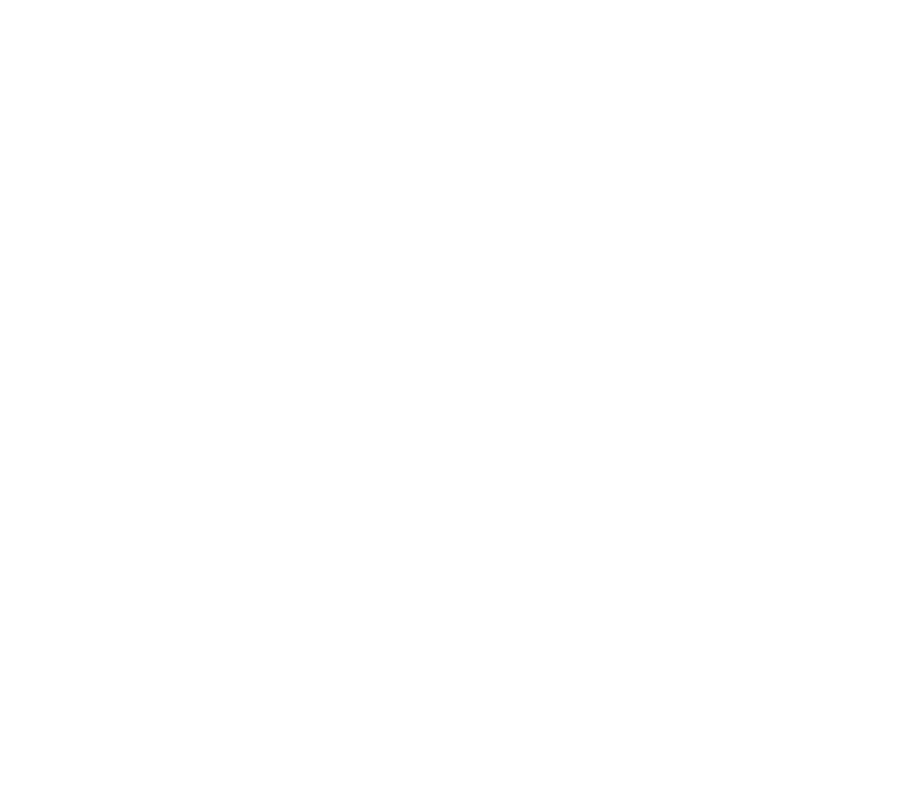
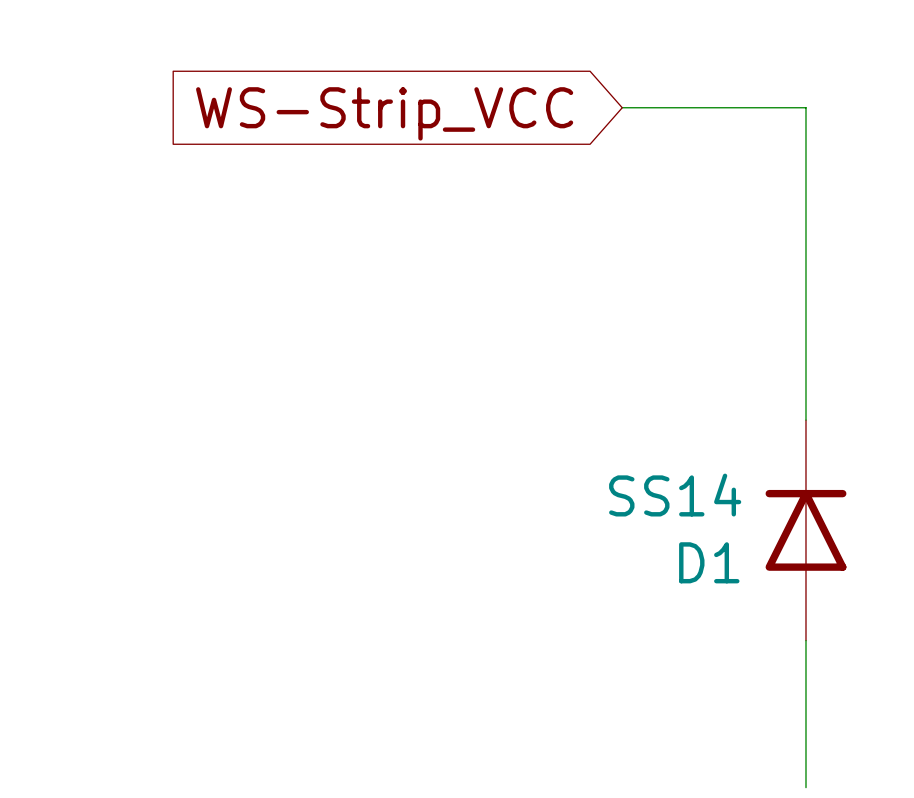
wire: none -> (622, 107) (805, 107) (805, 420)
global label: none -> WS-Strip_VCC (384, 113)
D1: none -> SS14 (805, 530)
wire: none -> (805, 640) (805, 787)

